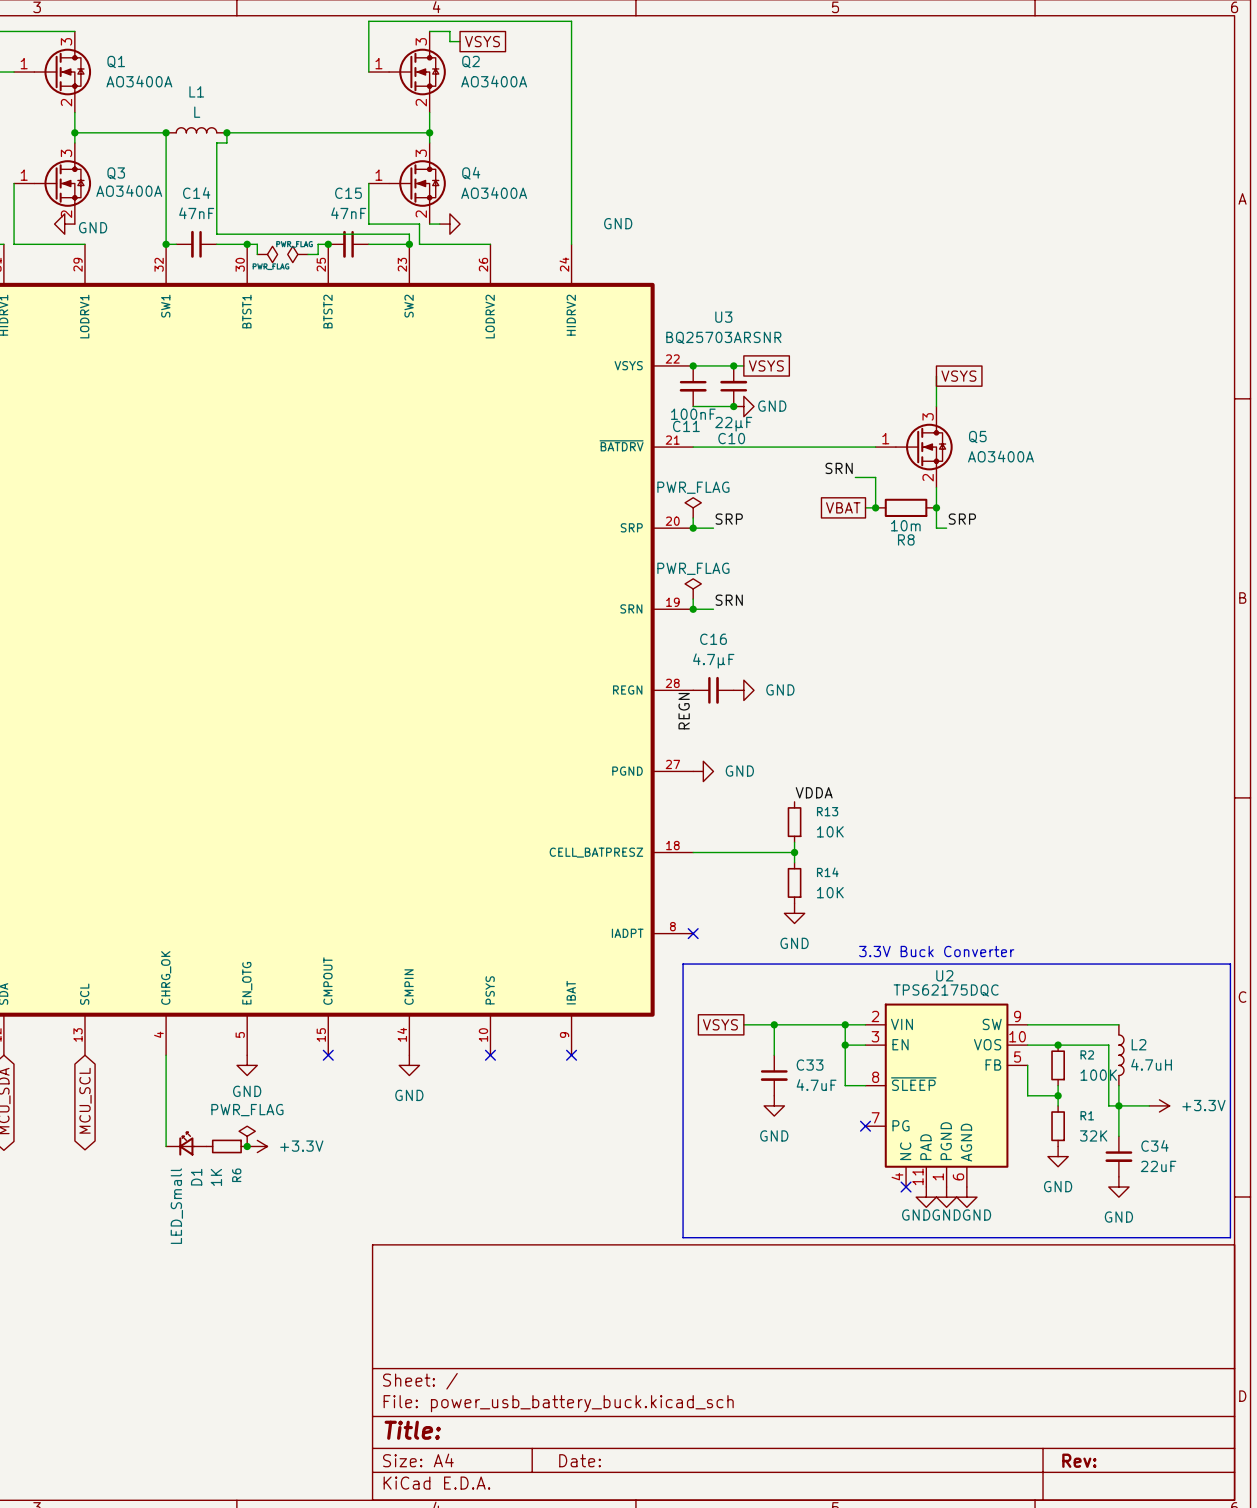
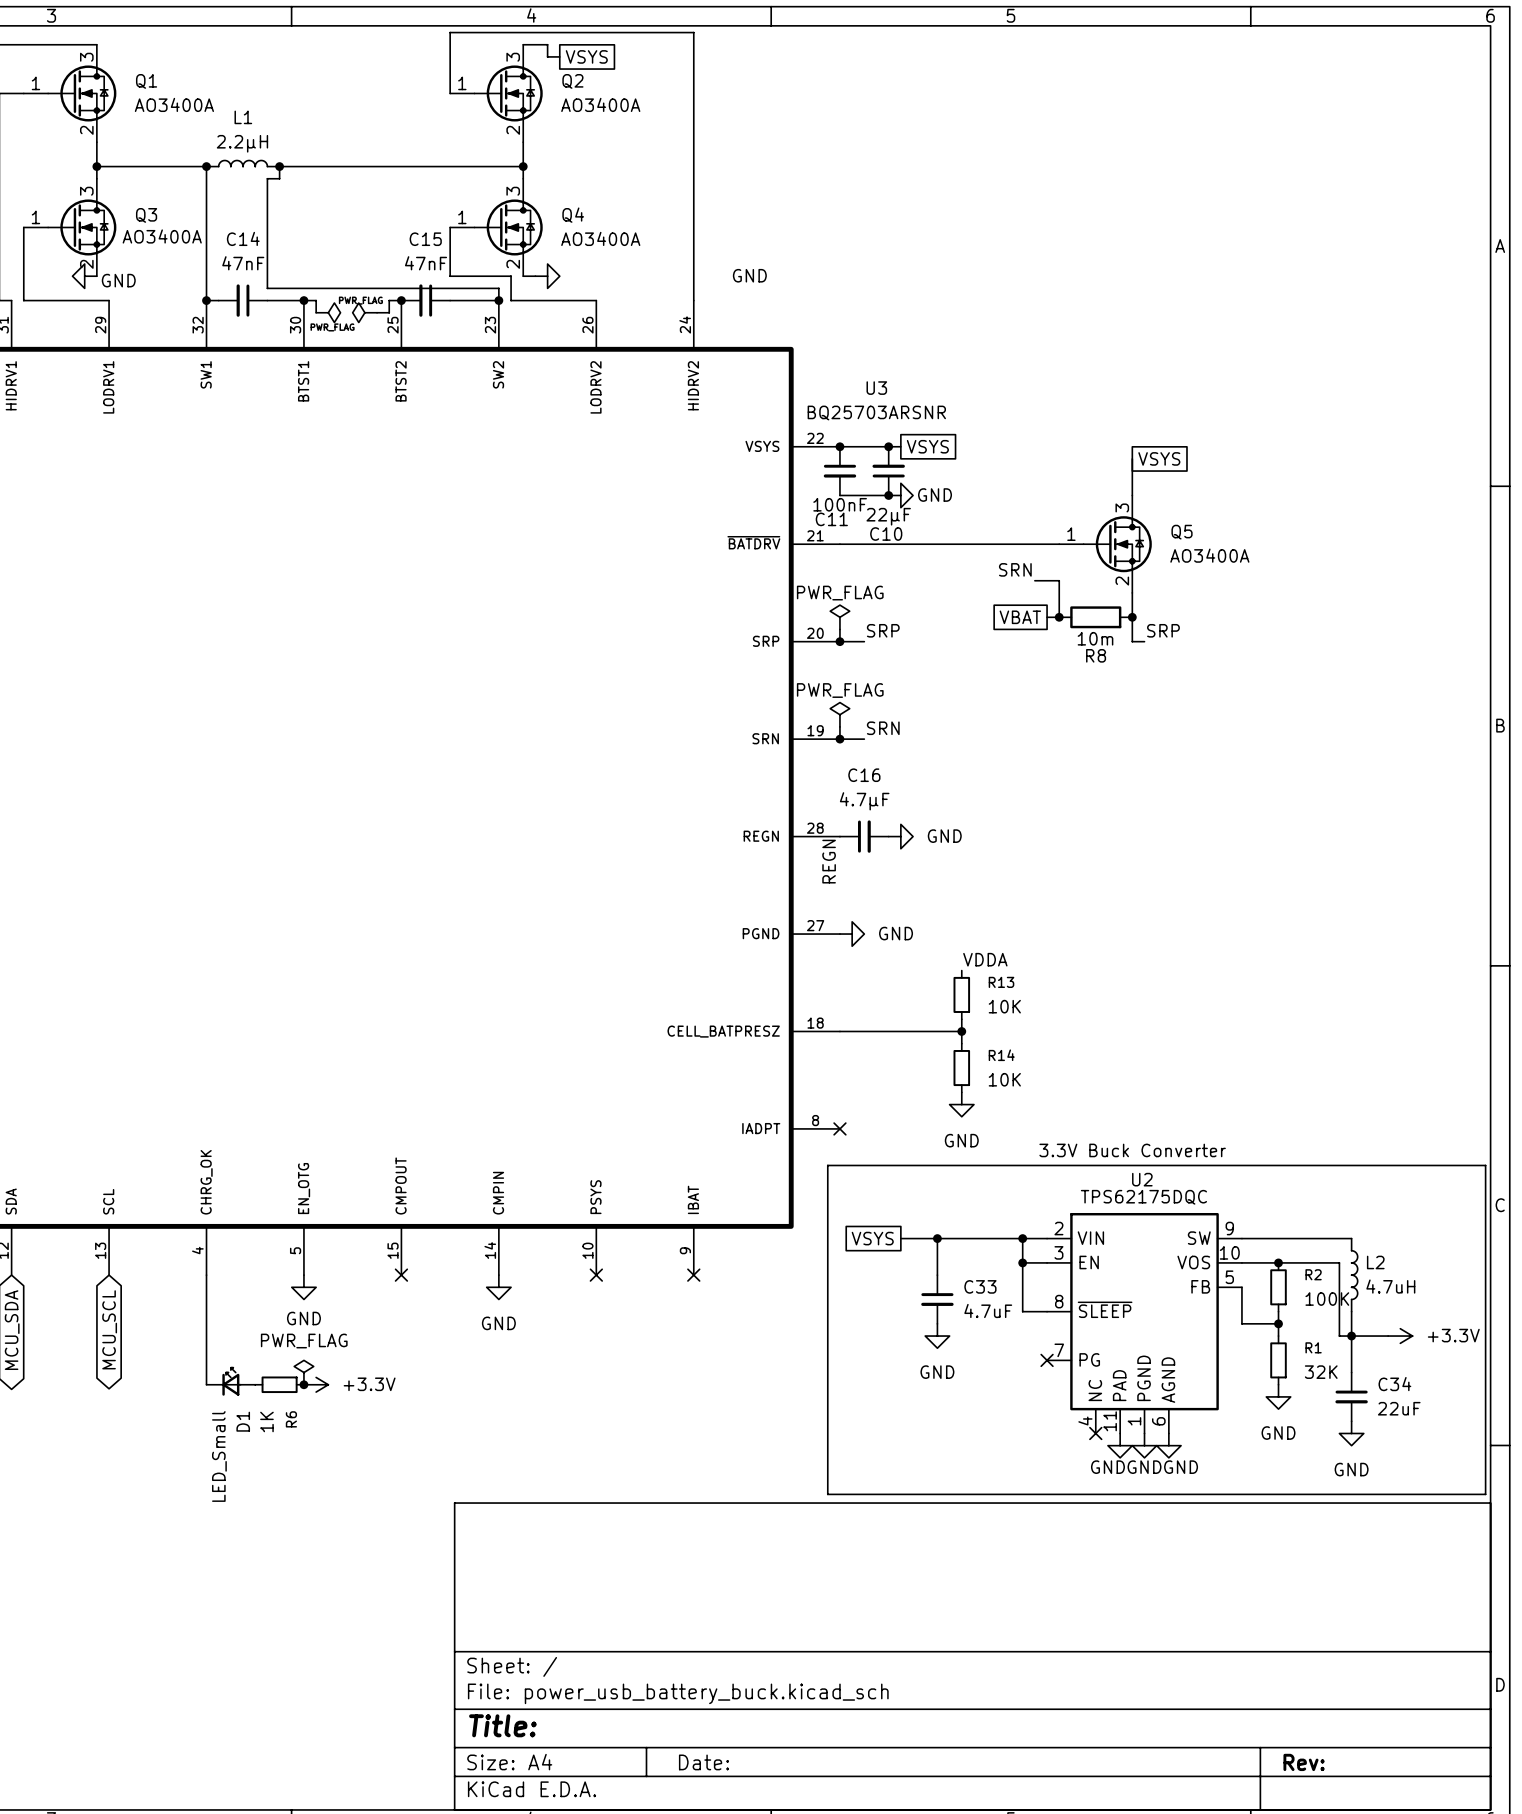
L1 value: L (197, 112) -> 2.2µH (242, 143)

